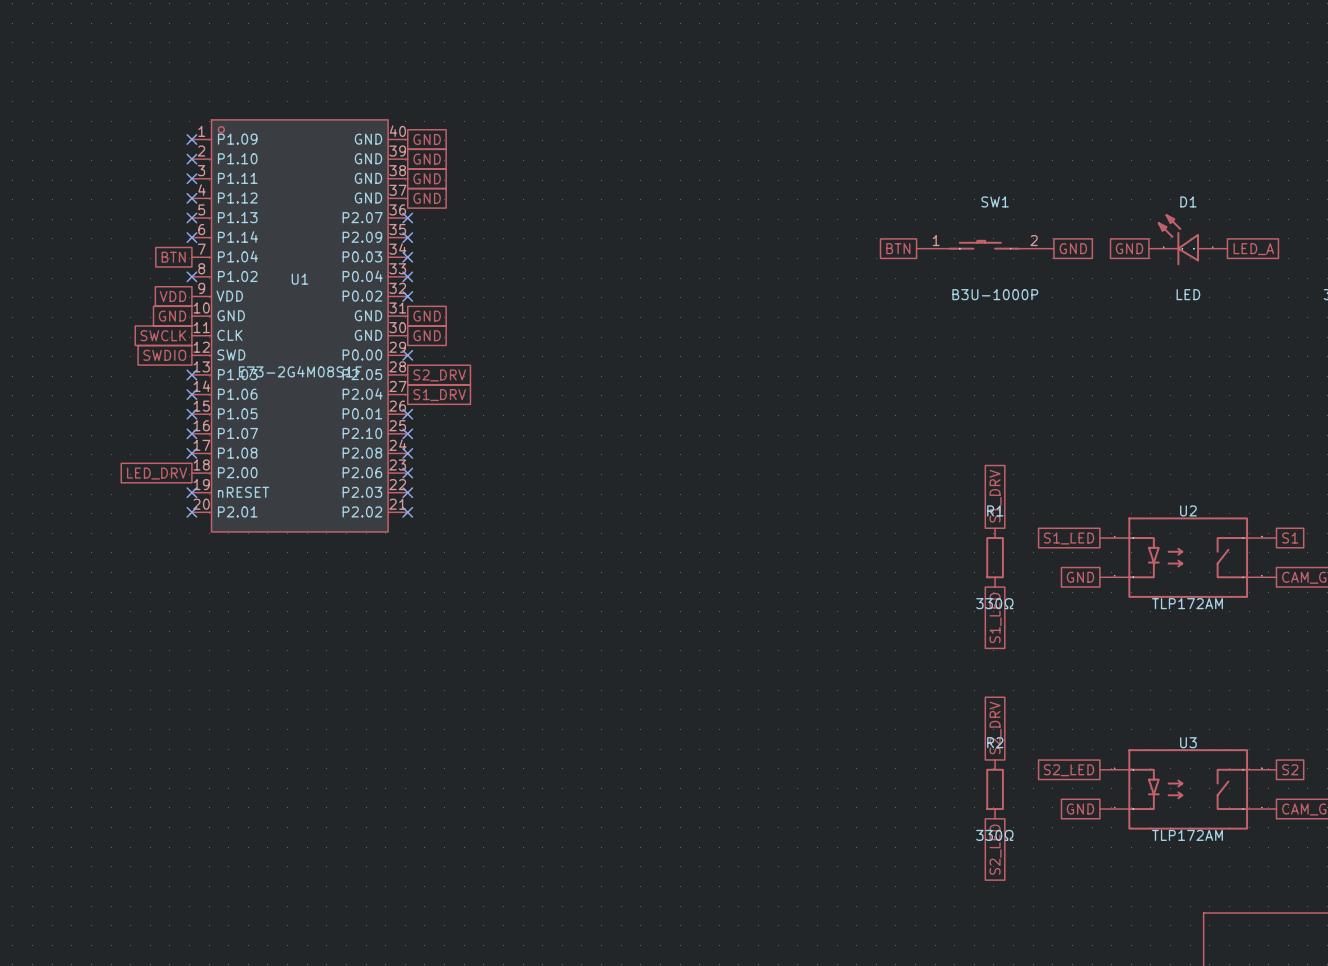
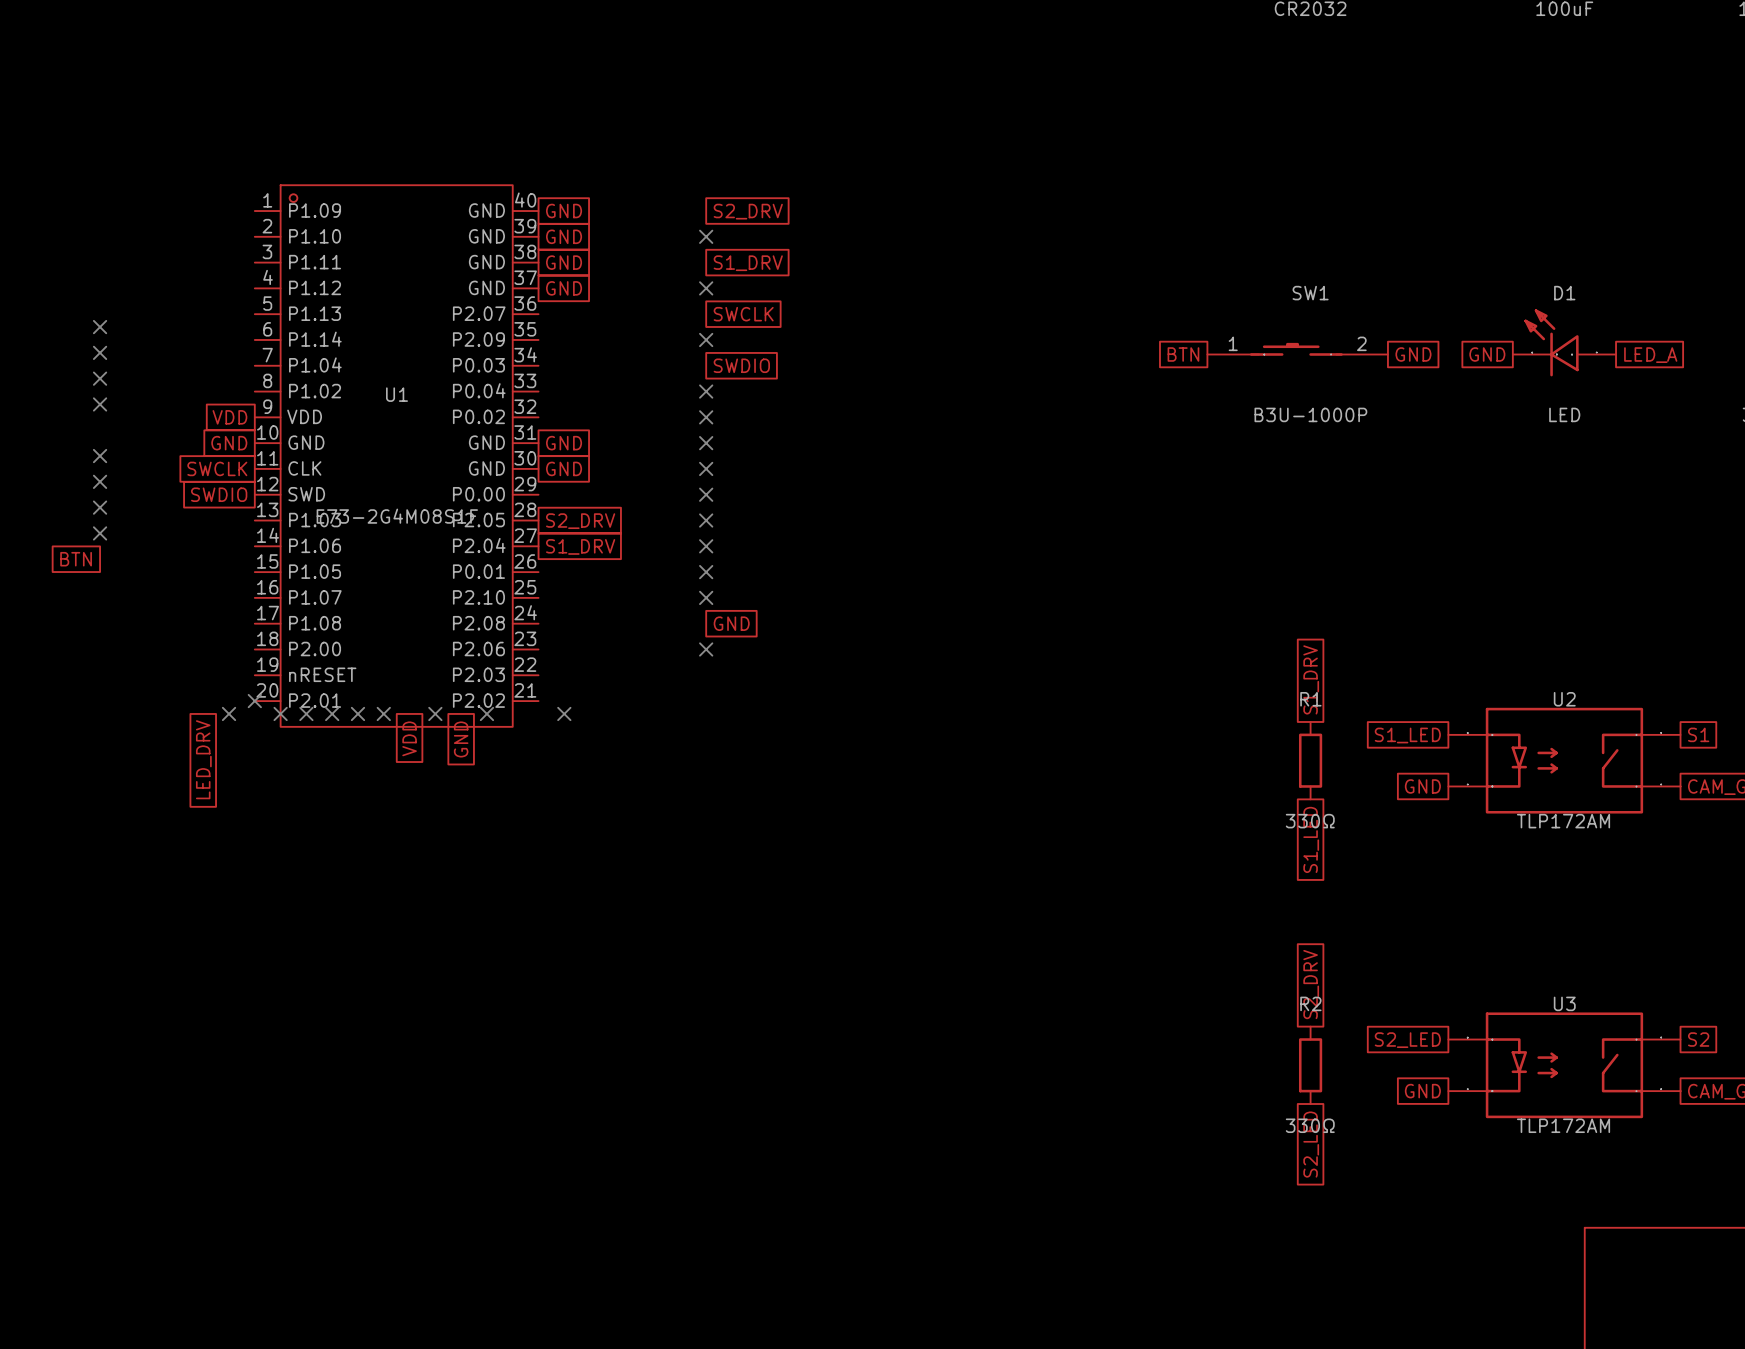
no-connect mark: (191, 139) -> none
global label: none -> S2_DRV (748, 211)
no-connect mark: (191, 159) -> none
no-connect mark: none -> (706, 236)
no-connect mark: (191, 178) -> none
global label: none -> S1_DRV (748, 263)
no-connect mark: (191, 198) -> none
no-connect mark: none -> (706, 288)
no-connect mark: (191, 217) -> none
no-connect mark: (407, 217) -> none
global label: none -> SWCLK (743, 314)
no-connect mark: none -> (100, 327)
no-connect mark: (191, 237) -> none
no-connect mark: (407, 237) -> none
no-connect mark: none -> (706, 339)
no-connect mark: none -> (100, 352)
global label position: BTN (173, 257) -> BTN (76, 559)
no-connect mark: (407, 257) -> none
global label: none -> SWDIO (741, 365)
no-connect mark: none -> (100, 378)
no-connect mark: (191, 276) -> none
no-connect mark: (407, 276) -> none
no-connect mark: none -> (706, 391)
no-connect mark: none -> (100, 404)
no-connect mark: (407, 296) -> none
no-connect mark: none -> (706, 417)
no-connect mark: none -> (706, 443)
no-connect mark: none -> (100, 456)
no-connect mark: none -> (706, 468)
no-connect mark: none -> (100, 481)
no-connect mark: (407, 355) -> none
no-connect mark: none -> (706, 494)
no-connect mark: none -> (100, 507)
no-connect mark: (191, 374) -> none
no-connect mark: none -> (706, 520)
no-connect mark: none -> (100, 533)
no-connect mark: (191, 394) -> none
no-connect mark: none -> (706, 546)
no-connect mark: (191, 414) -> none
no-connect mark: (407, 414) -> none
no-connect mark: none -> (706, 572)
no-connect mark: (191, 433) -> none
no-connect mark: (407, 433) -> none
no-connect mark: none -> (706, 597)
no-connect mark: (191, 453) -> none
no-connect mark: (407, 453) -> none
global label: none -> GND (731, 623)
global label rotation: 0° (157, 473) -> 90° counterclockwise (203, 759)
global label position: LED_DRV (157, 473) -> LED_DRV (203, 759)
no-connect mark: (407, 473) -> none
no-connect mark: none -> (706, 649)
no-connect mark: (191, 492) -> none
no-connect mark: (407, 492) -> none
no-connect mark: (407, 512) -> none
no-connect mark: none -> (229, 713)
no-connect mark: none -> (280, 713)
no-connect mark: none -> (306, 713)
no-connect mark: none -> (332, 713)
no-connect mark: none -> (357, 713)
no-connect mark: none -> (383, 713)
no-connect mark: none -> (435, 713)
no-connect mark: none -> (486, 713)
no-connect mark: none -> (564, 713)
global label: none -> VDD (409, 738)
global label: none -> GND (461, 739)

